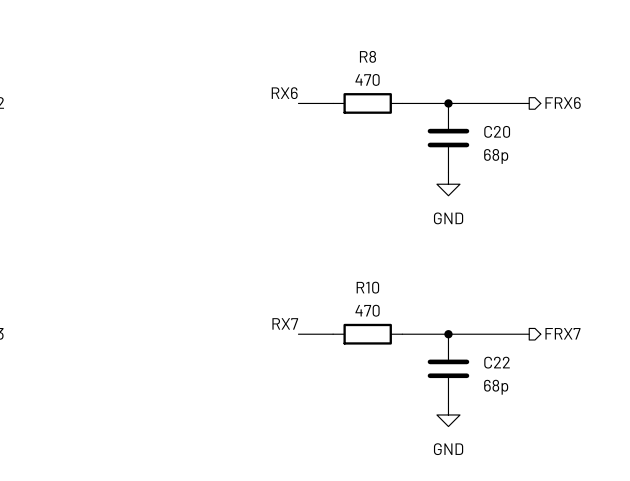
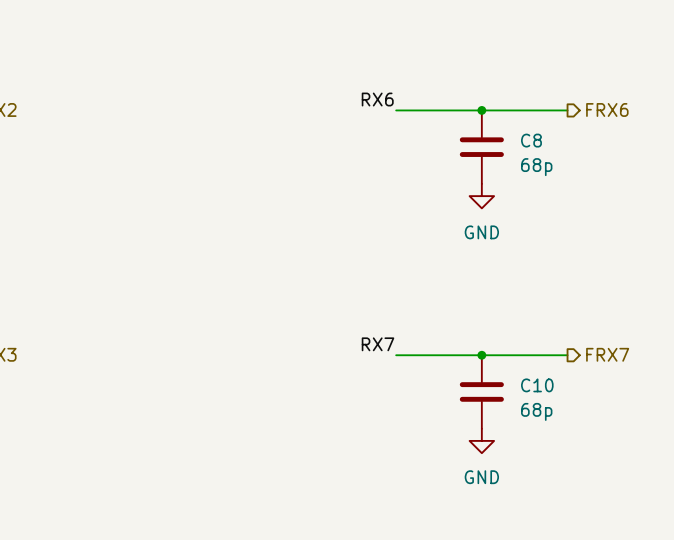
label position: RX6 (284, 93) -> RX6 (377, 99)
wire: (298, 103) (333, 103) -> (396, 110) (432, 110)
R8: 470 (367, 103) -> none
C20 name: C20 (497, 131) -> C8 (531, 140)
label position: RX7 (285, 323) -> RX7 (378, 344)
wire: (298, 334) (333, 334) -> (396, 355) (432, 355)
R10: 470 (367, 334) -> none
C22 name: C22 (497, 362) -> C10 (537, 385)

